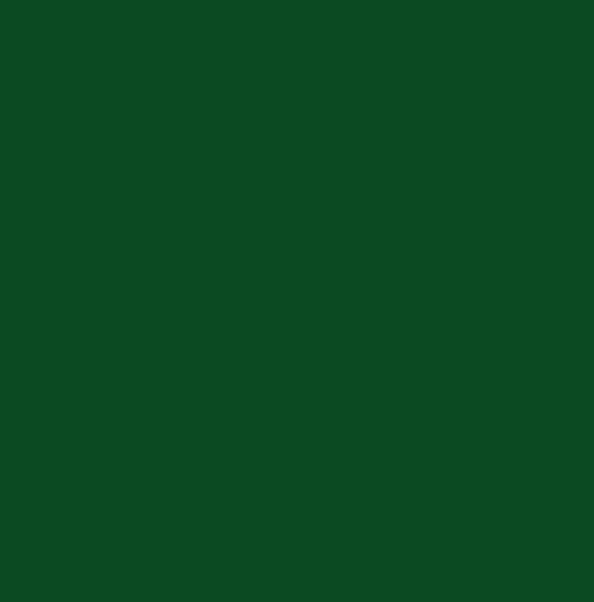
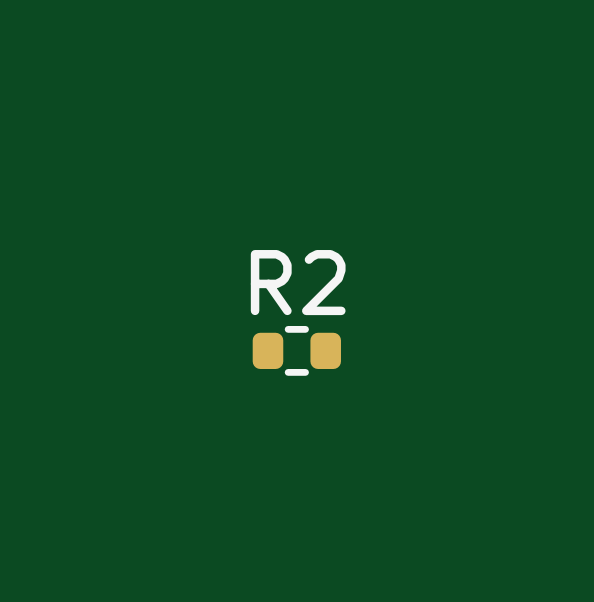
R2: none -> (296, 350)

